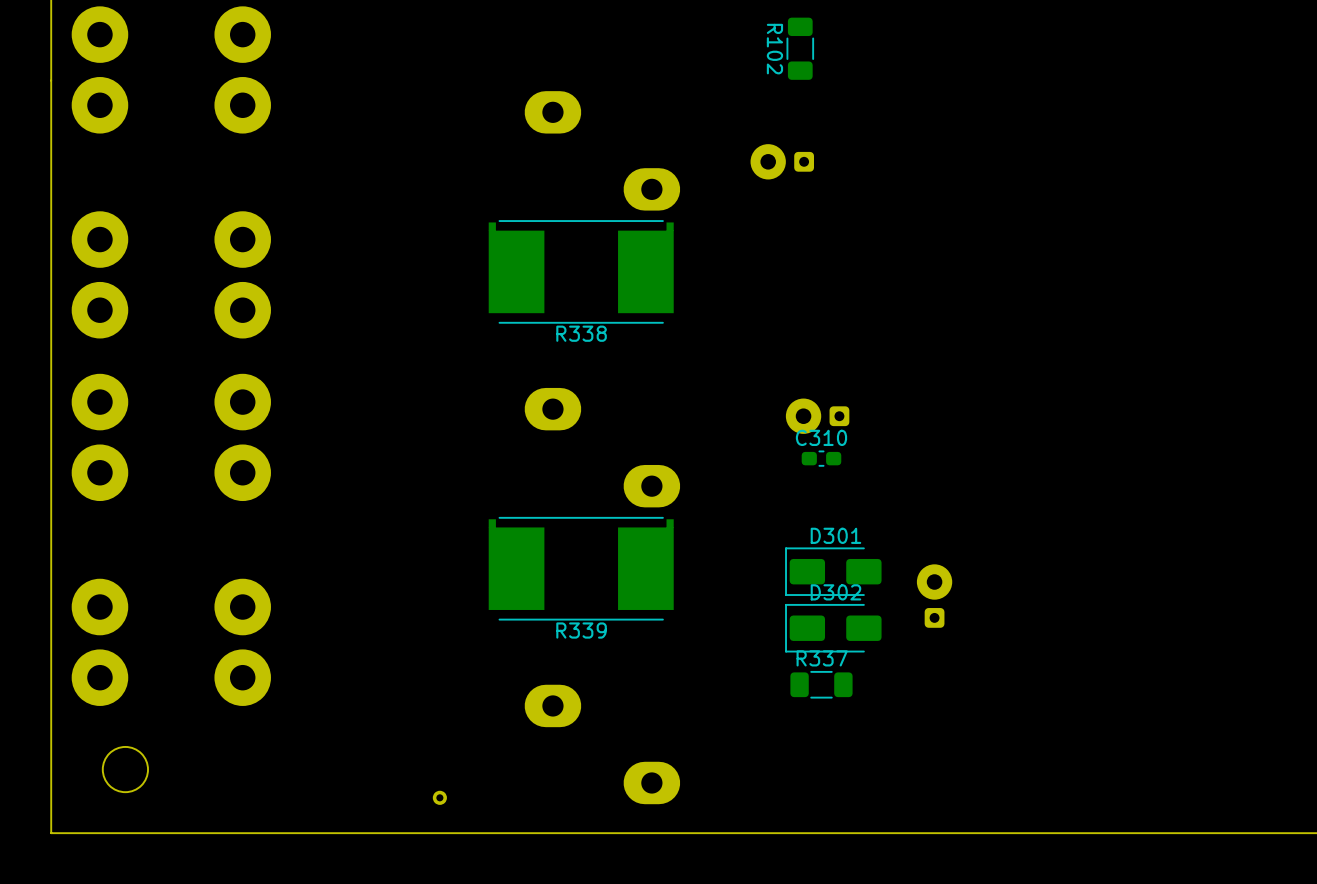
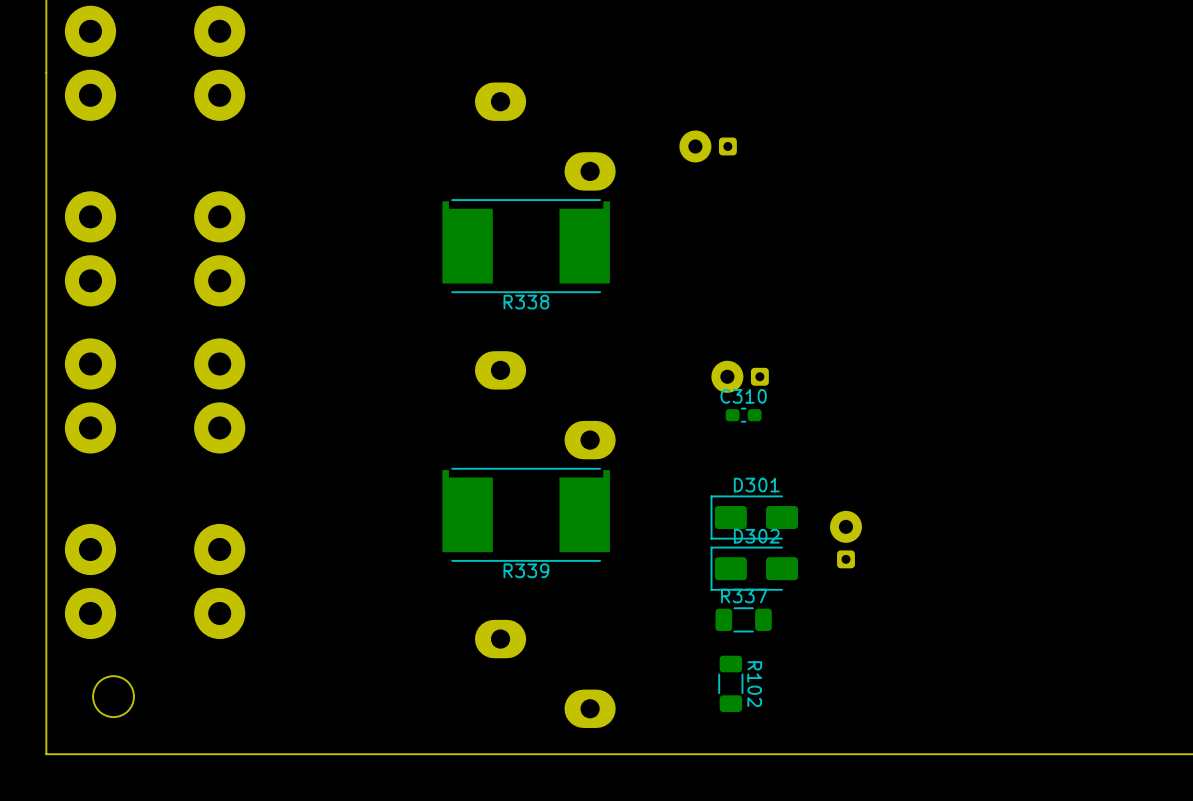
R102 position: (800, 48) -> (730, 683)
R102 name position: R102 (774, 49) -> R102 (754, 684)
part: (439, 797) -> none

